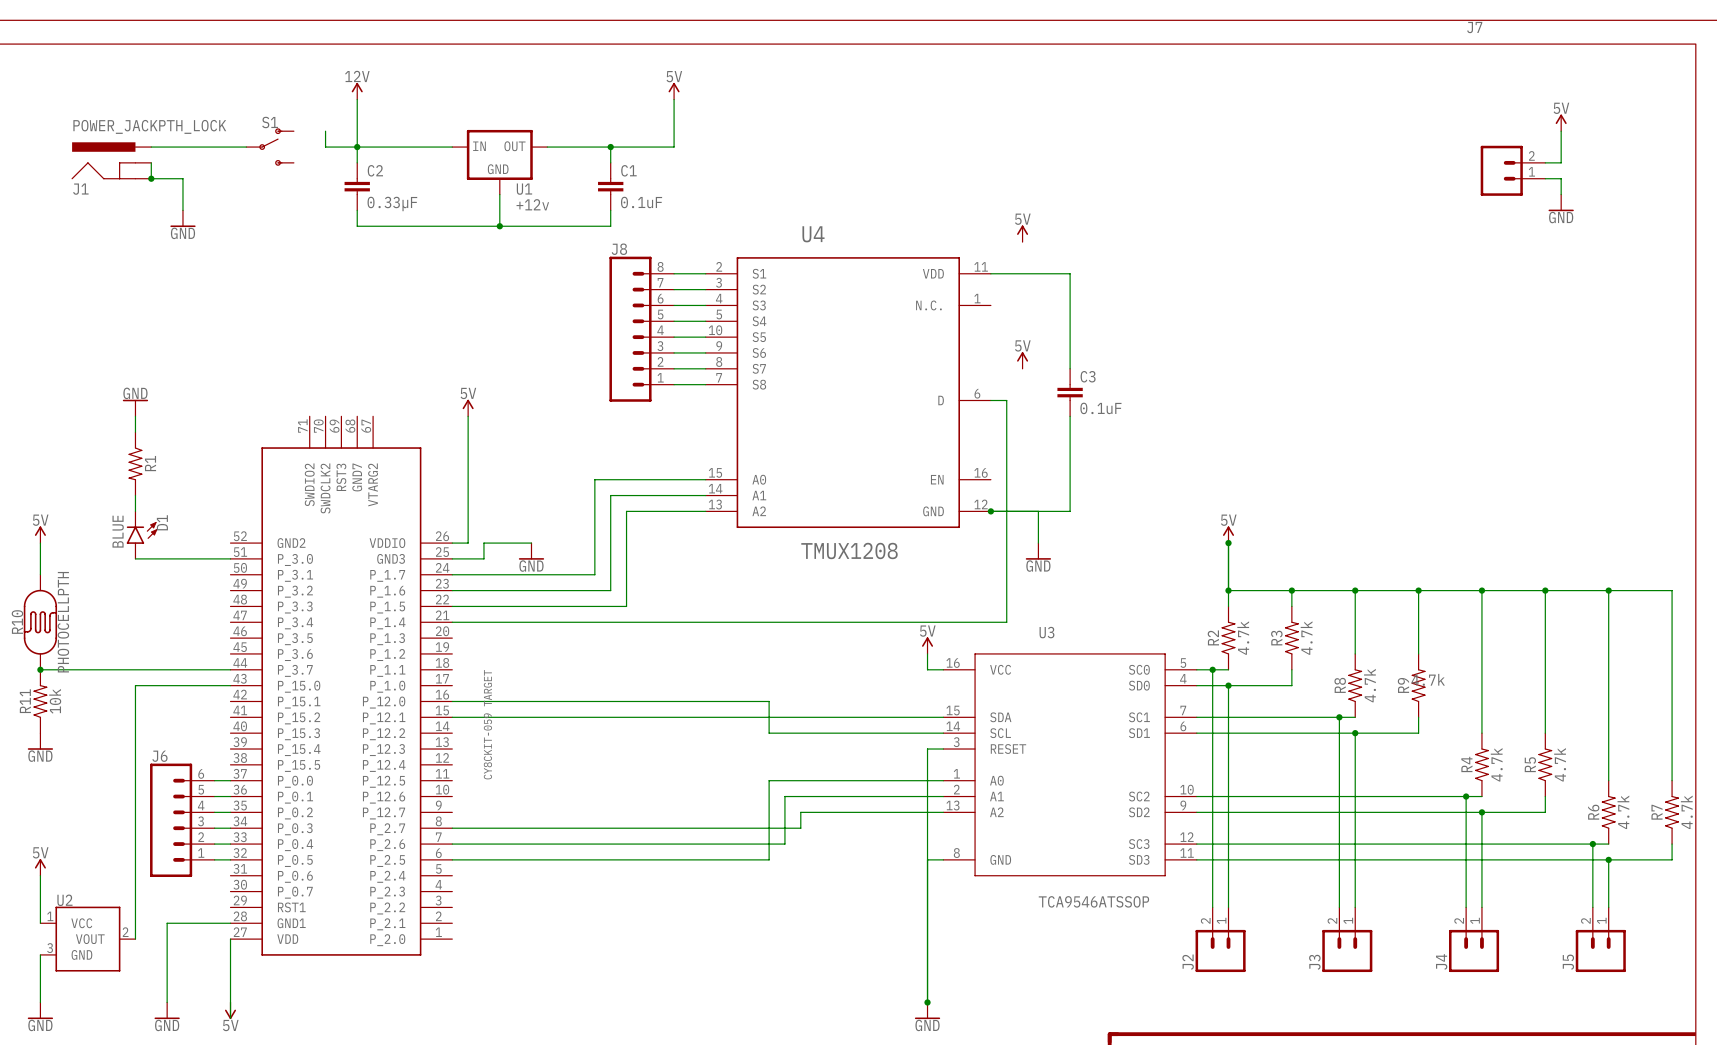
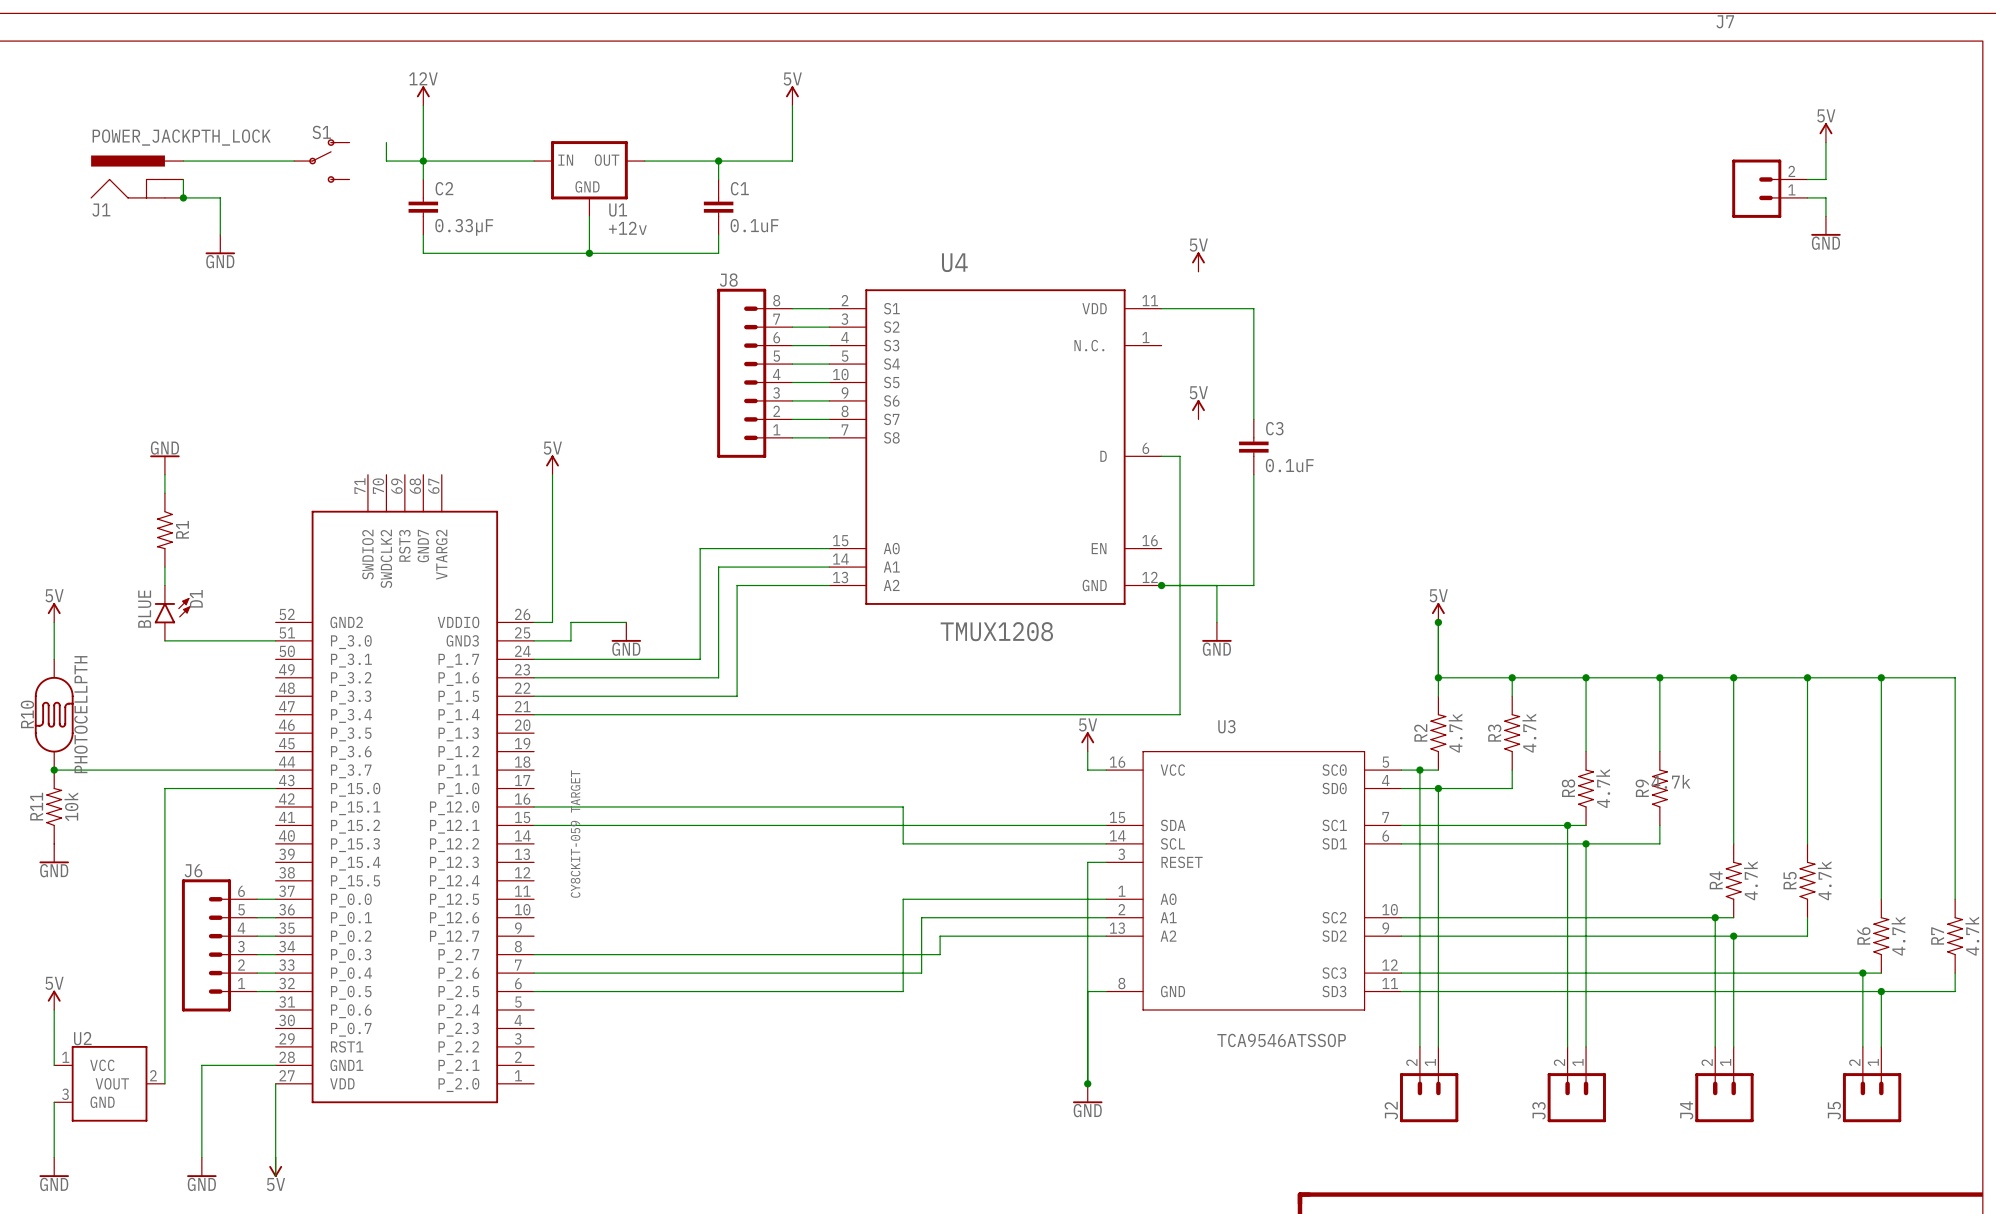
wire: (927, 939) (927, 1002) -> none
junction: none -> (1087, 1083)
junction: (927, 1002) -> none
power symbol position: GND (927, 1010) -> GND (1087, 1093)

